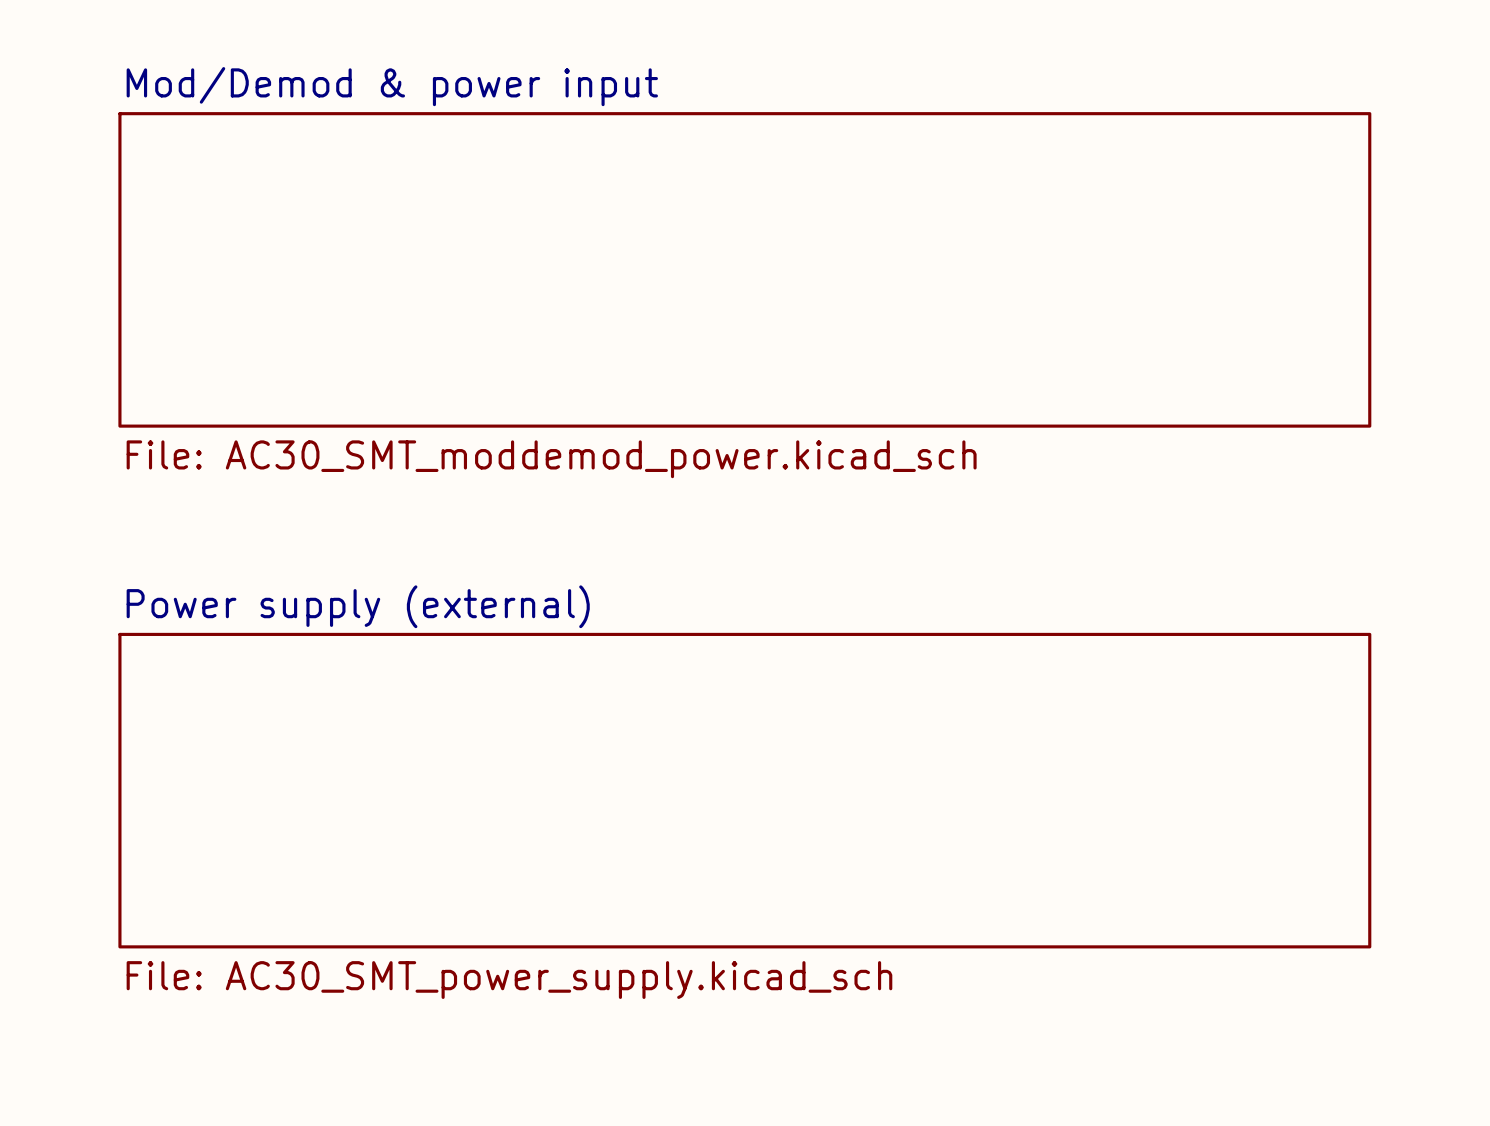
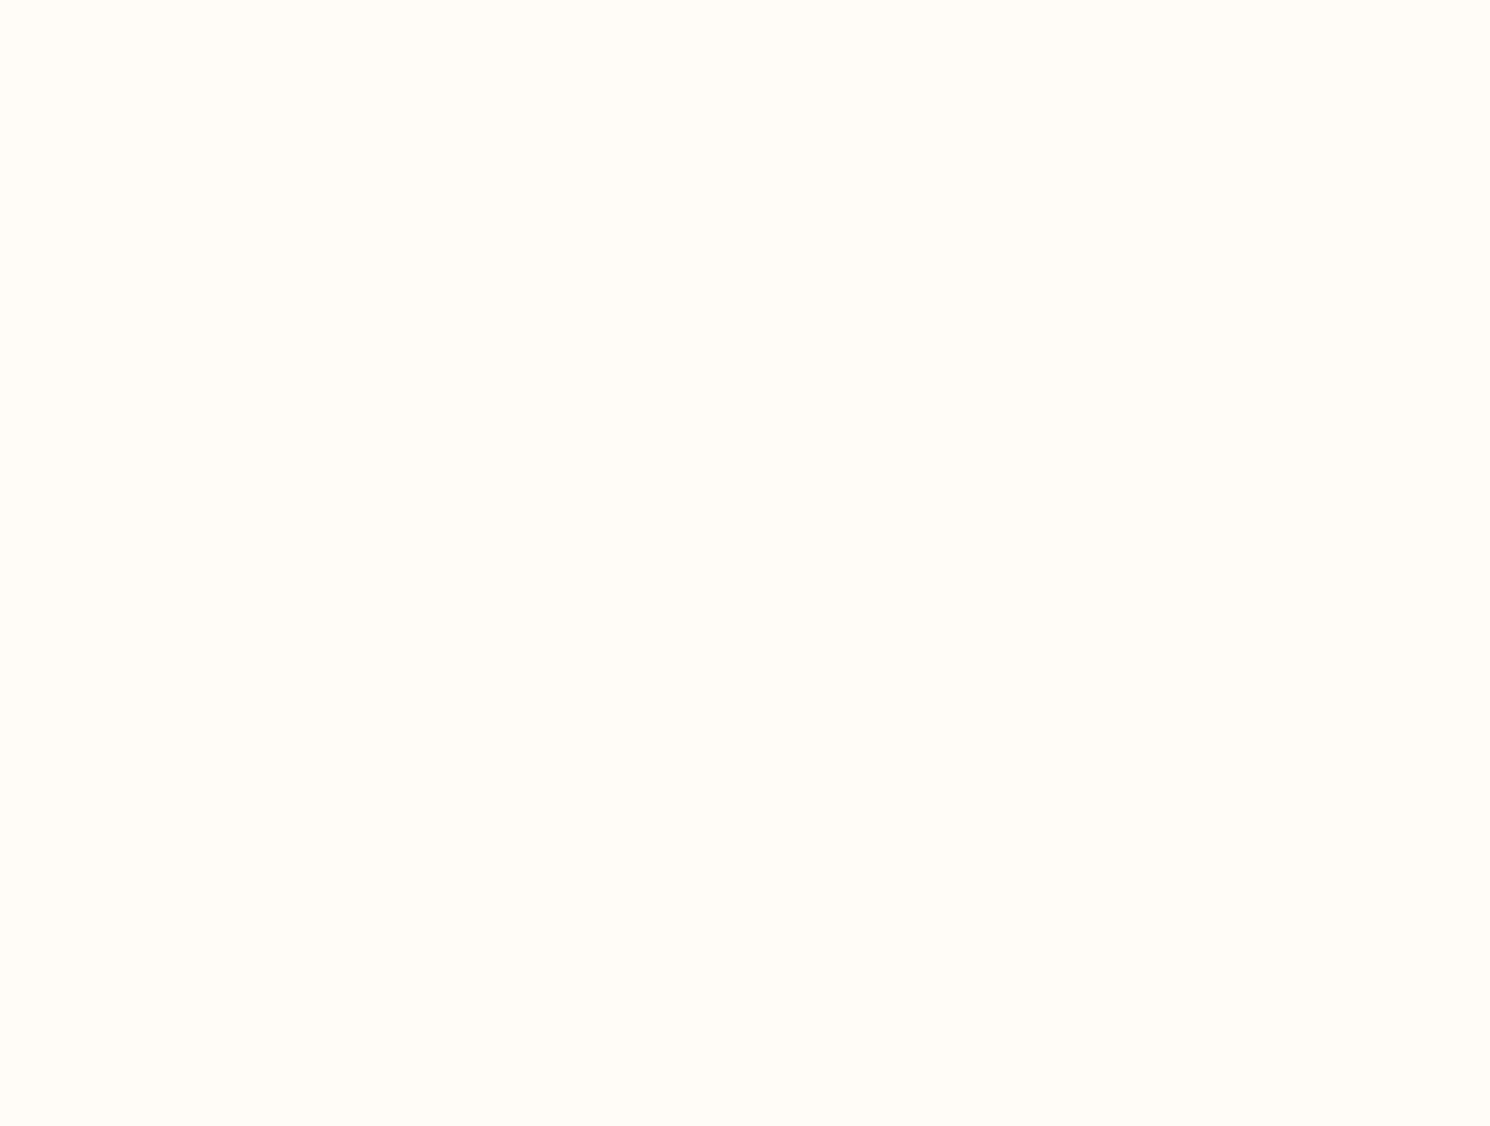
sheet Mod/Demod & power input: File: AC30_SMT_moddemod_power.kicad_sch (744, 269) -> none
sheet Power supply (external): File: AC30_SMT_power_supply.kicad_sch (744, 790) -> none

